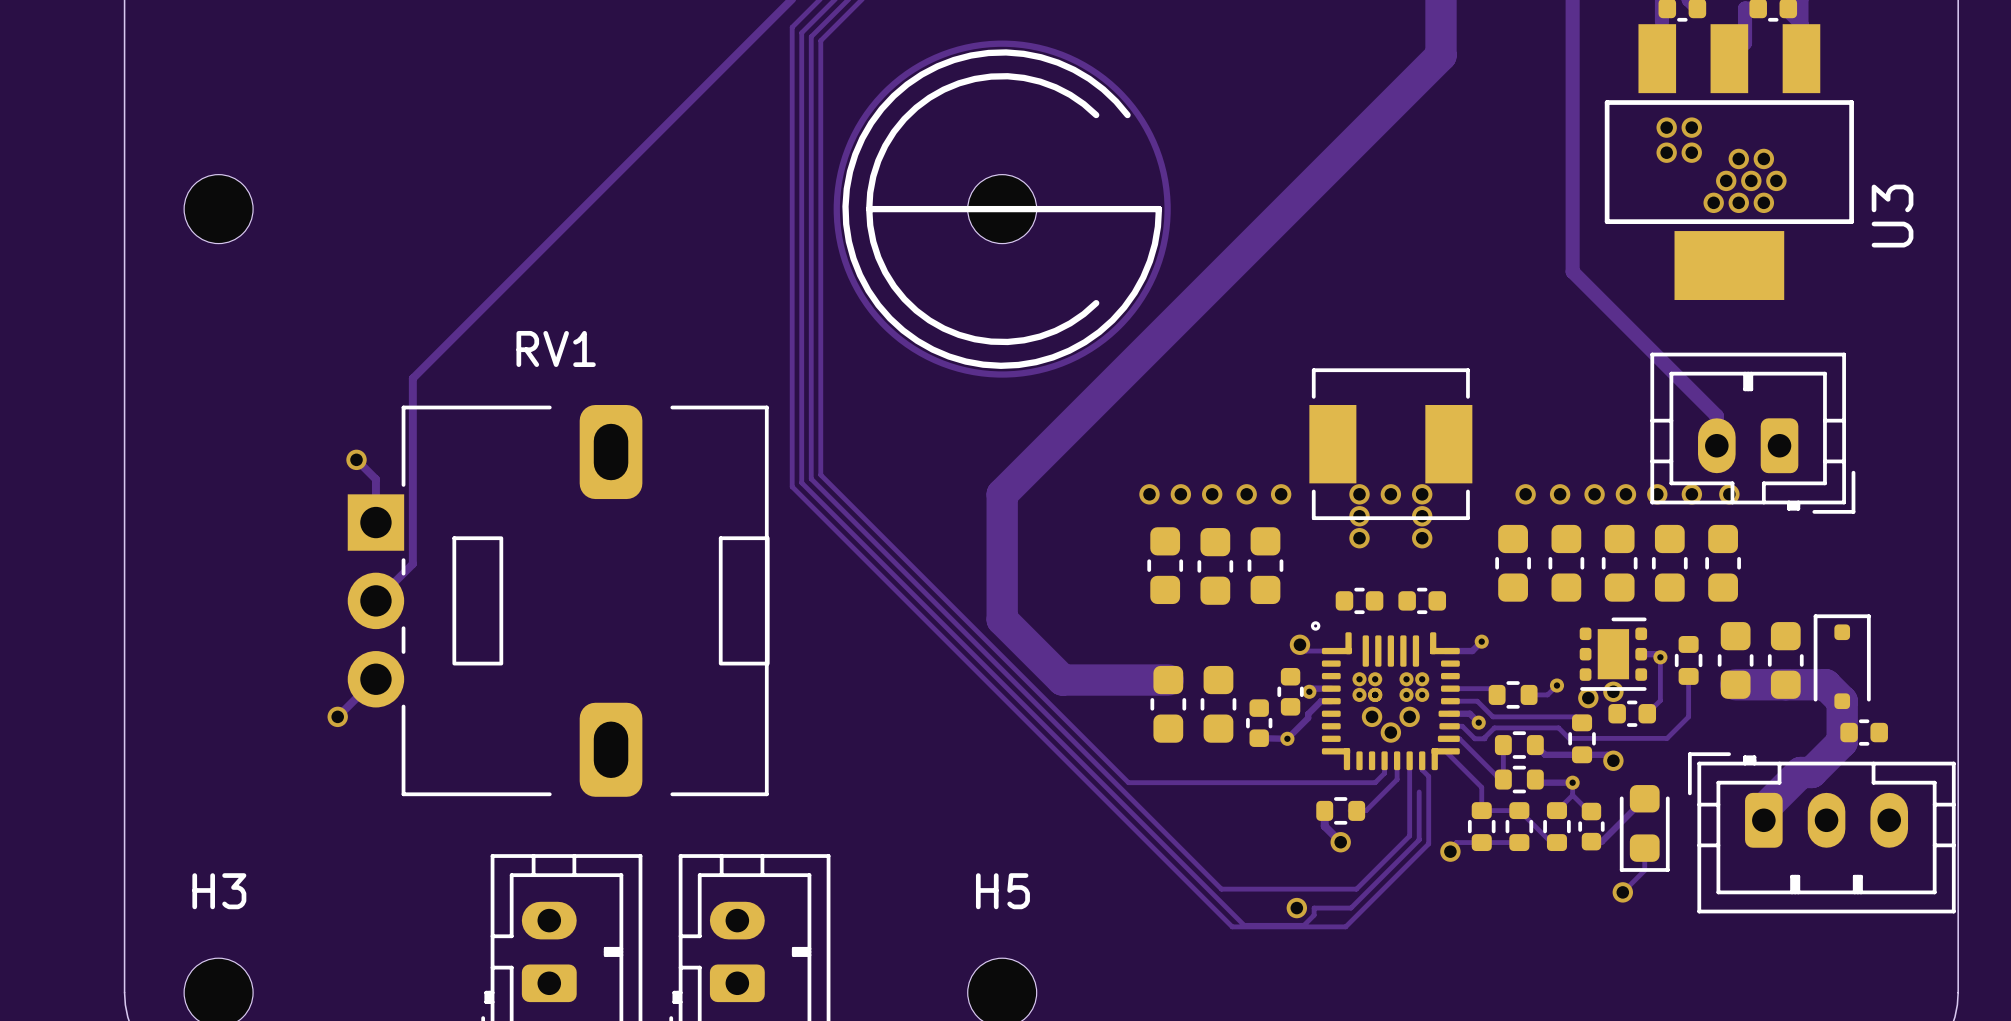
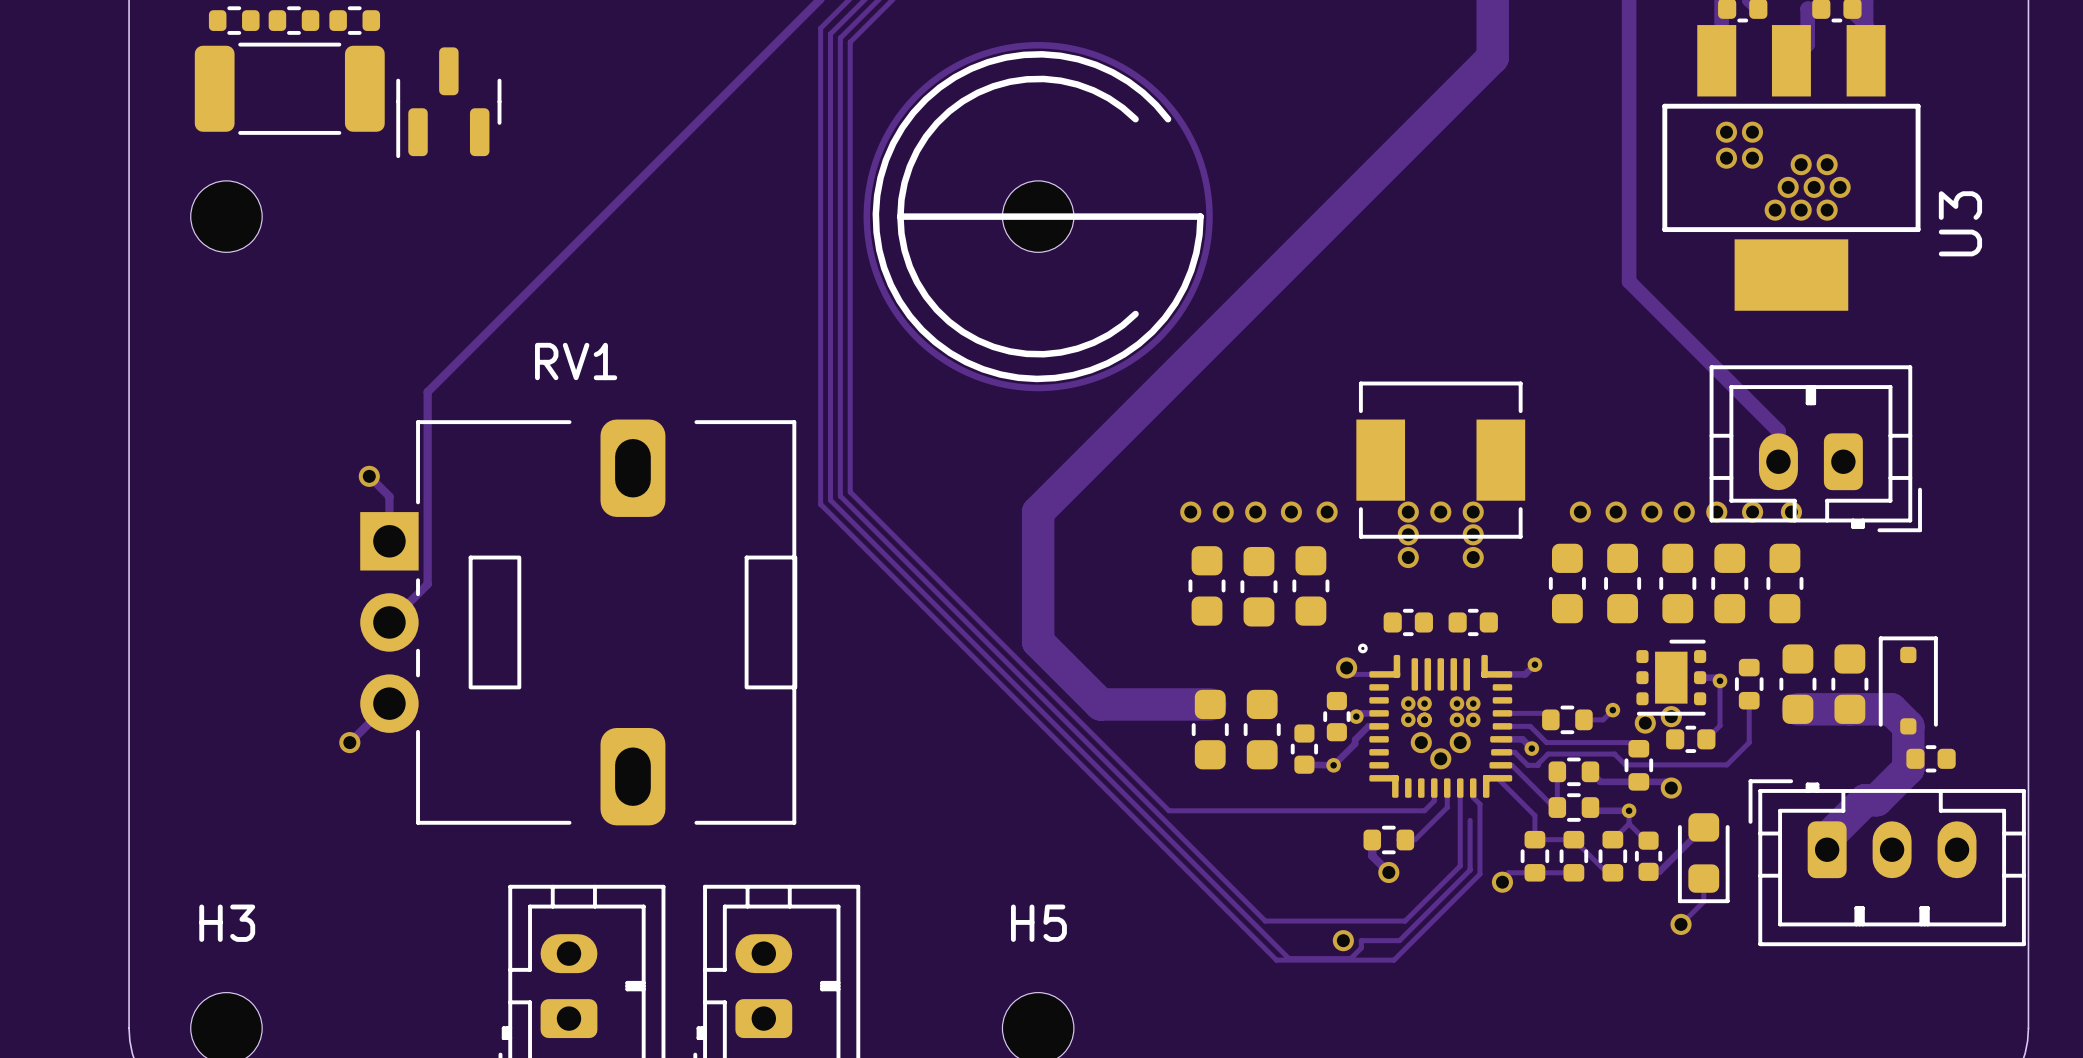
part: none -> (234, 20)
part: none -> (293, 20)
part: none -> (354, 20)
part: none -> (289, 88)
part: none -> (448, 102)

